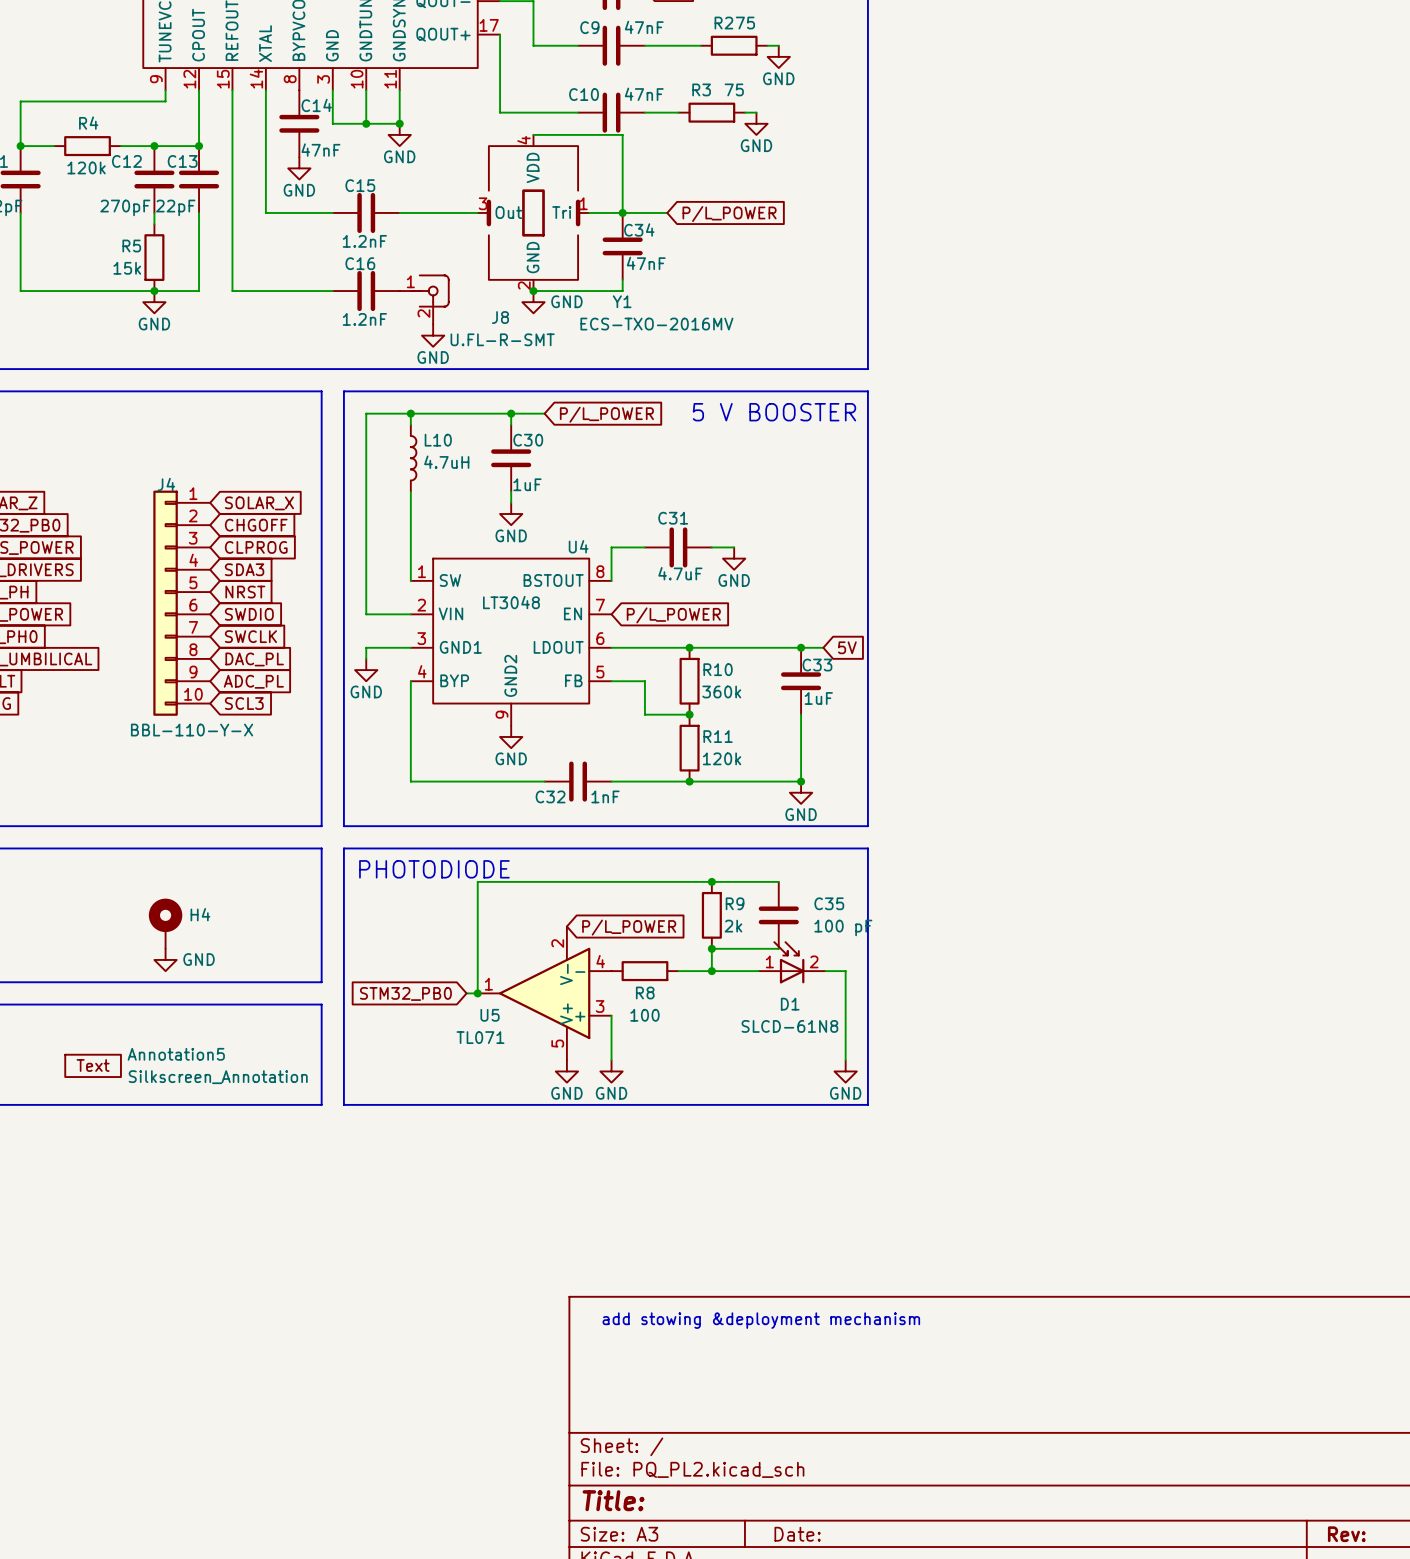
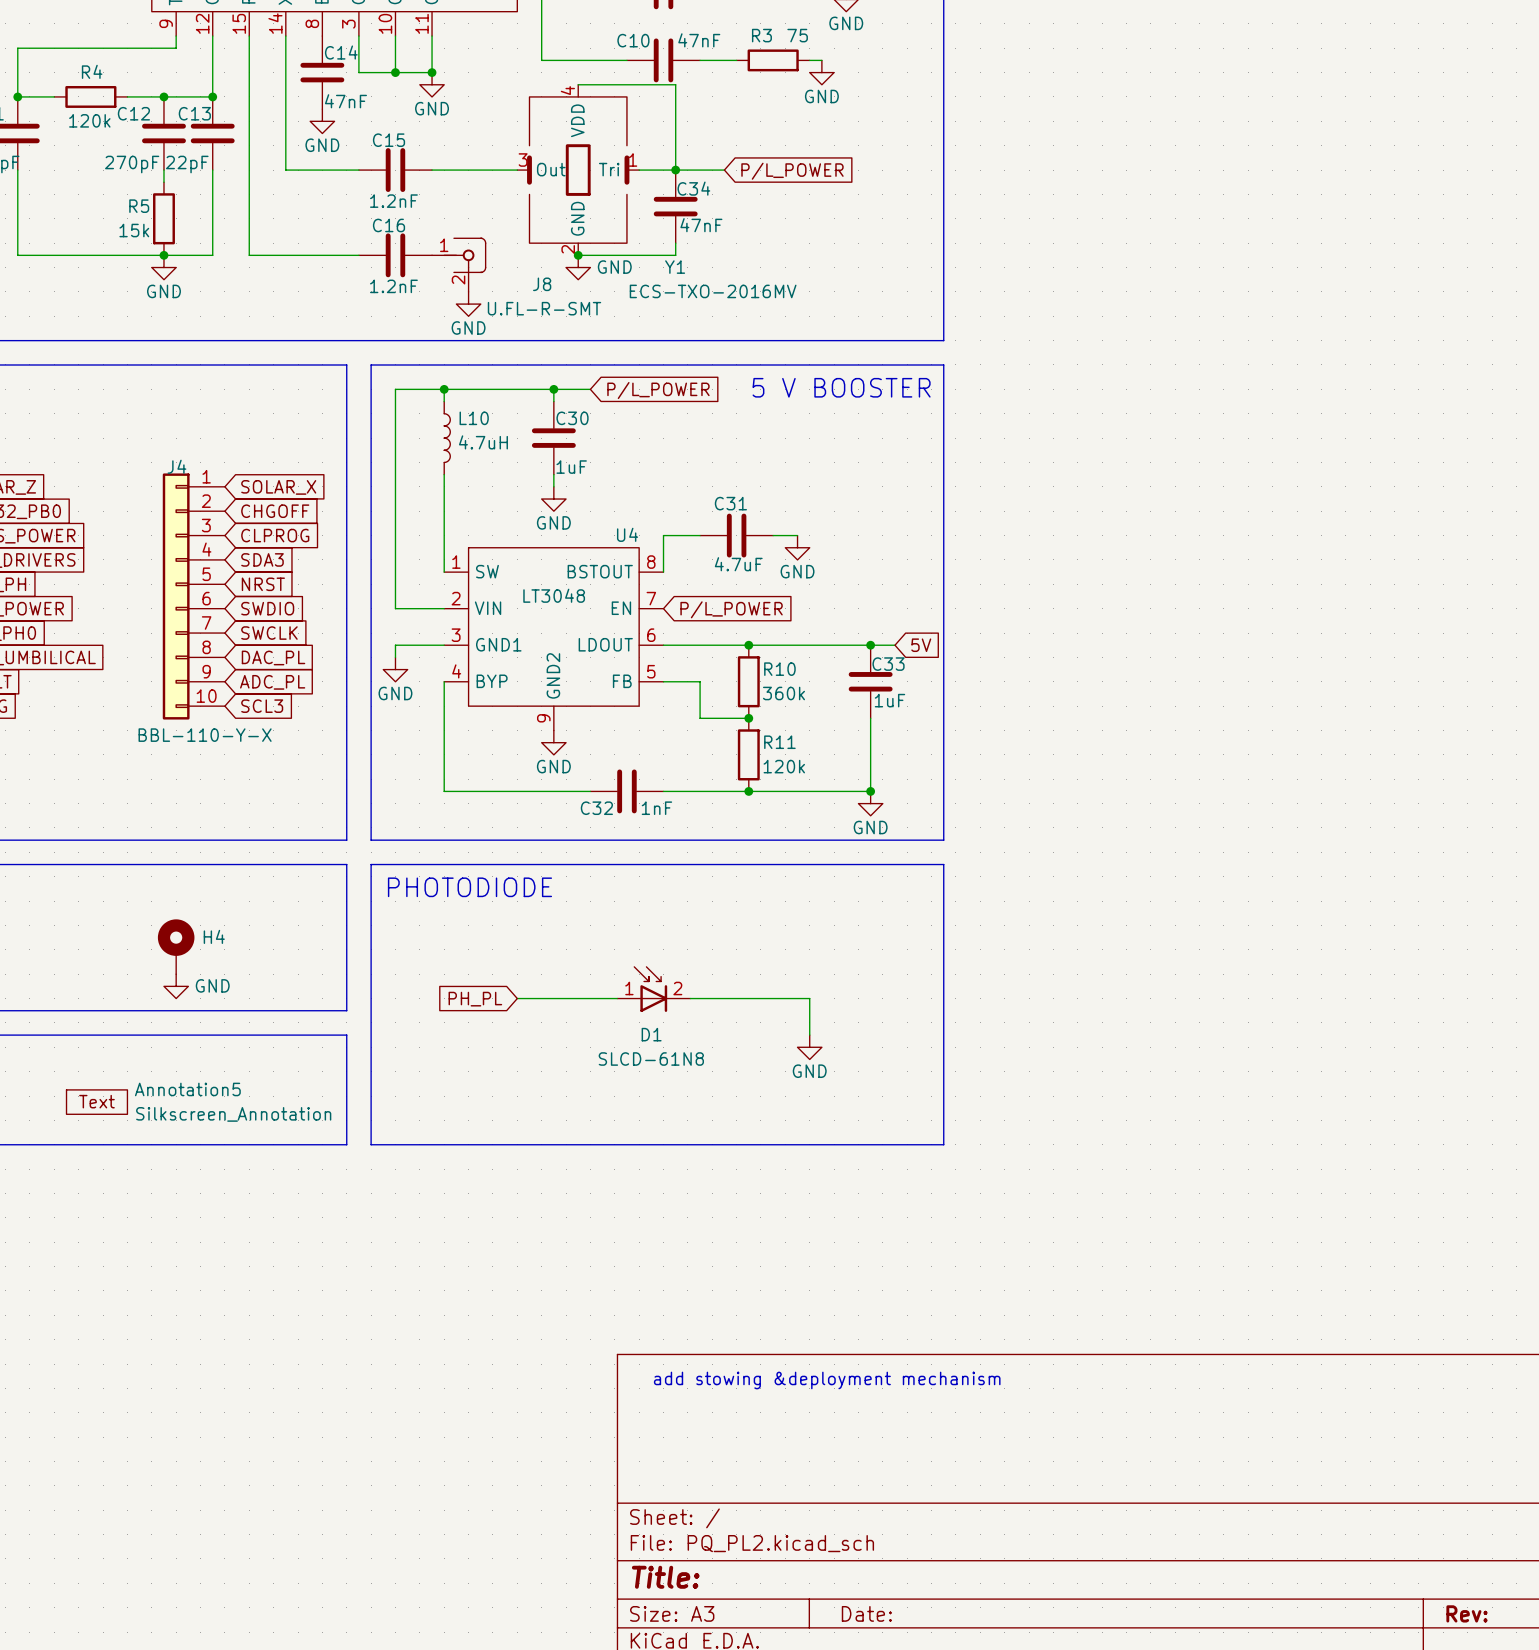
junction: (711, 881) -> none
wire: (778, 881) (477, 881) (477, 993) (466, 993) -> none
R9: 2k (711, 915) -> none
C35: 100 pF (778, 915) -> none
global label: P/L_POWER (629, 927) -> none
junction: (711, 948) -> none
wire: (778, 948) (711, 948) (711, 971) -> none
D1 position: (792, 962) -> (653, 989)
global label: none -> PH_PL (475, 999)
wire: none -> (517, 998) (617, 998)
wire: none -> (690, 998) (736, 998)
R8: 100 (644, 971) -> none
junction: (711, 971) -> none
wire: (745, 971) (758, 971) -> (809, 998) (809, 1035)
wire: (825, 971) (845, 971) (845, 1060) -> none
global label: STM32_PB0 (405, 993) -> none
junction: (477, 993) -> none
U5: TL071 (544, 993) -> none
wire: (611, 1015) (611, 1060) -> none
power symbol: none -> GND (809, 1047)
power symbol: GND (566, 1071) -> none
power symbol: GND (611, 1071) -> none
power symbol: GND (845, 1071) -> none

